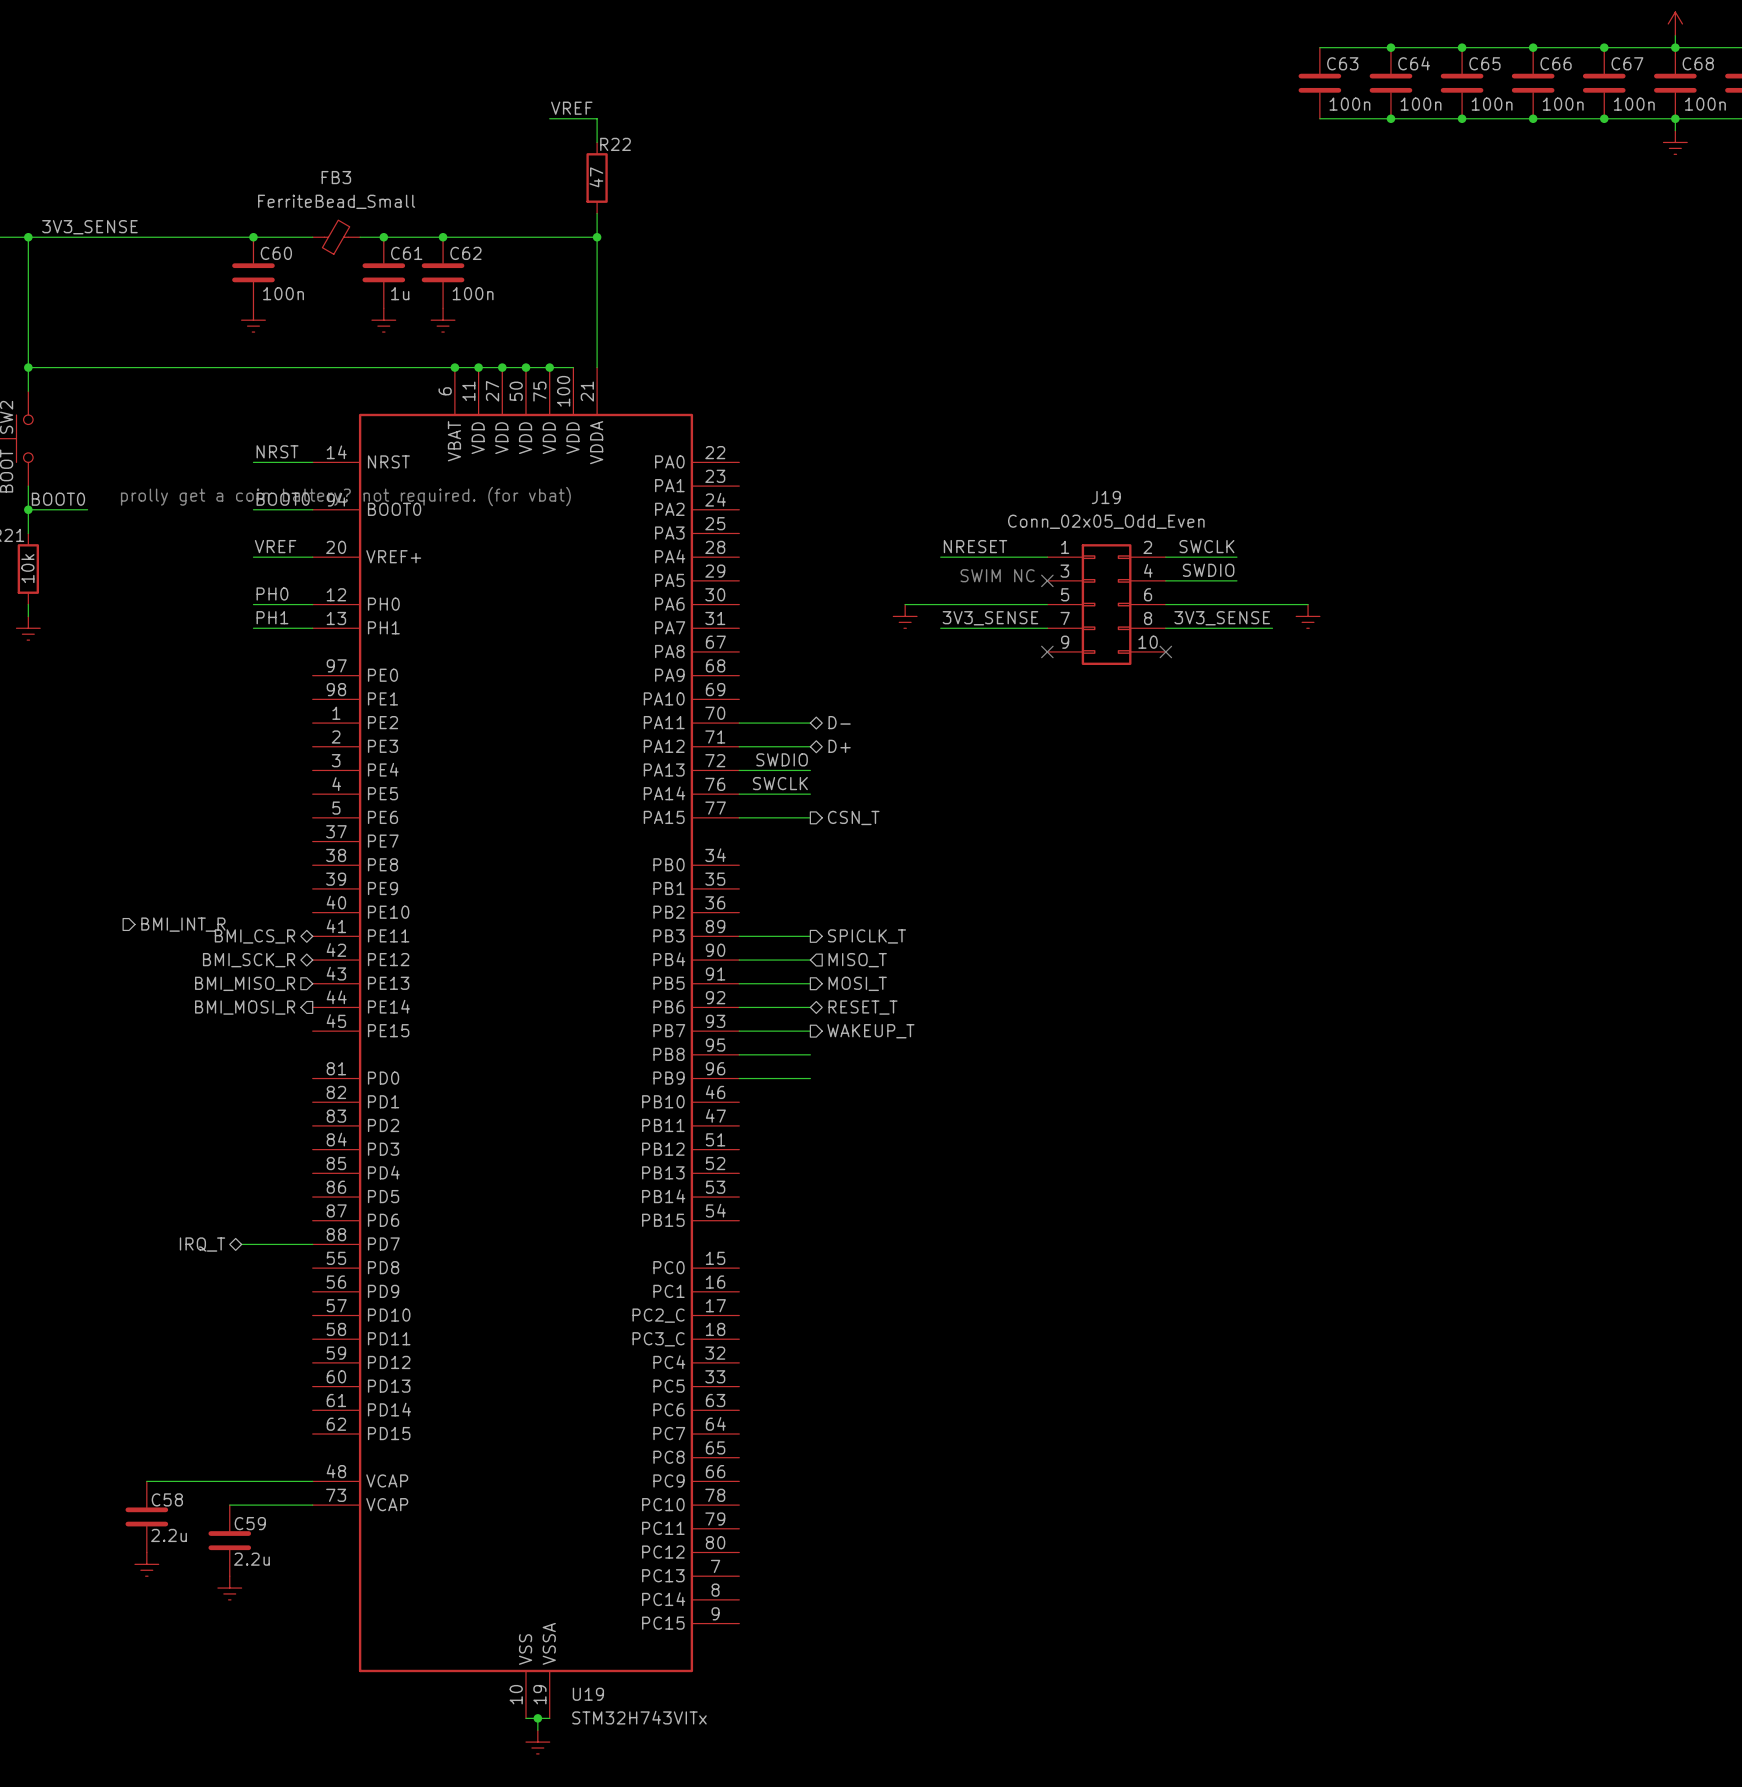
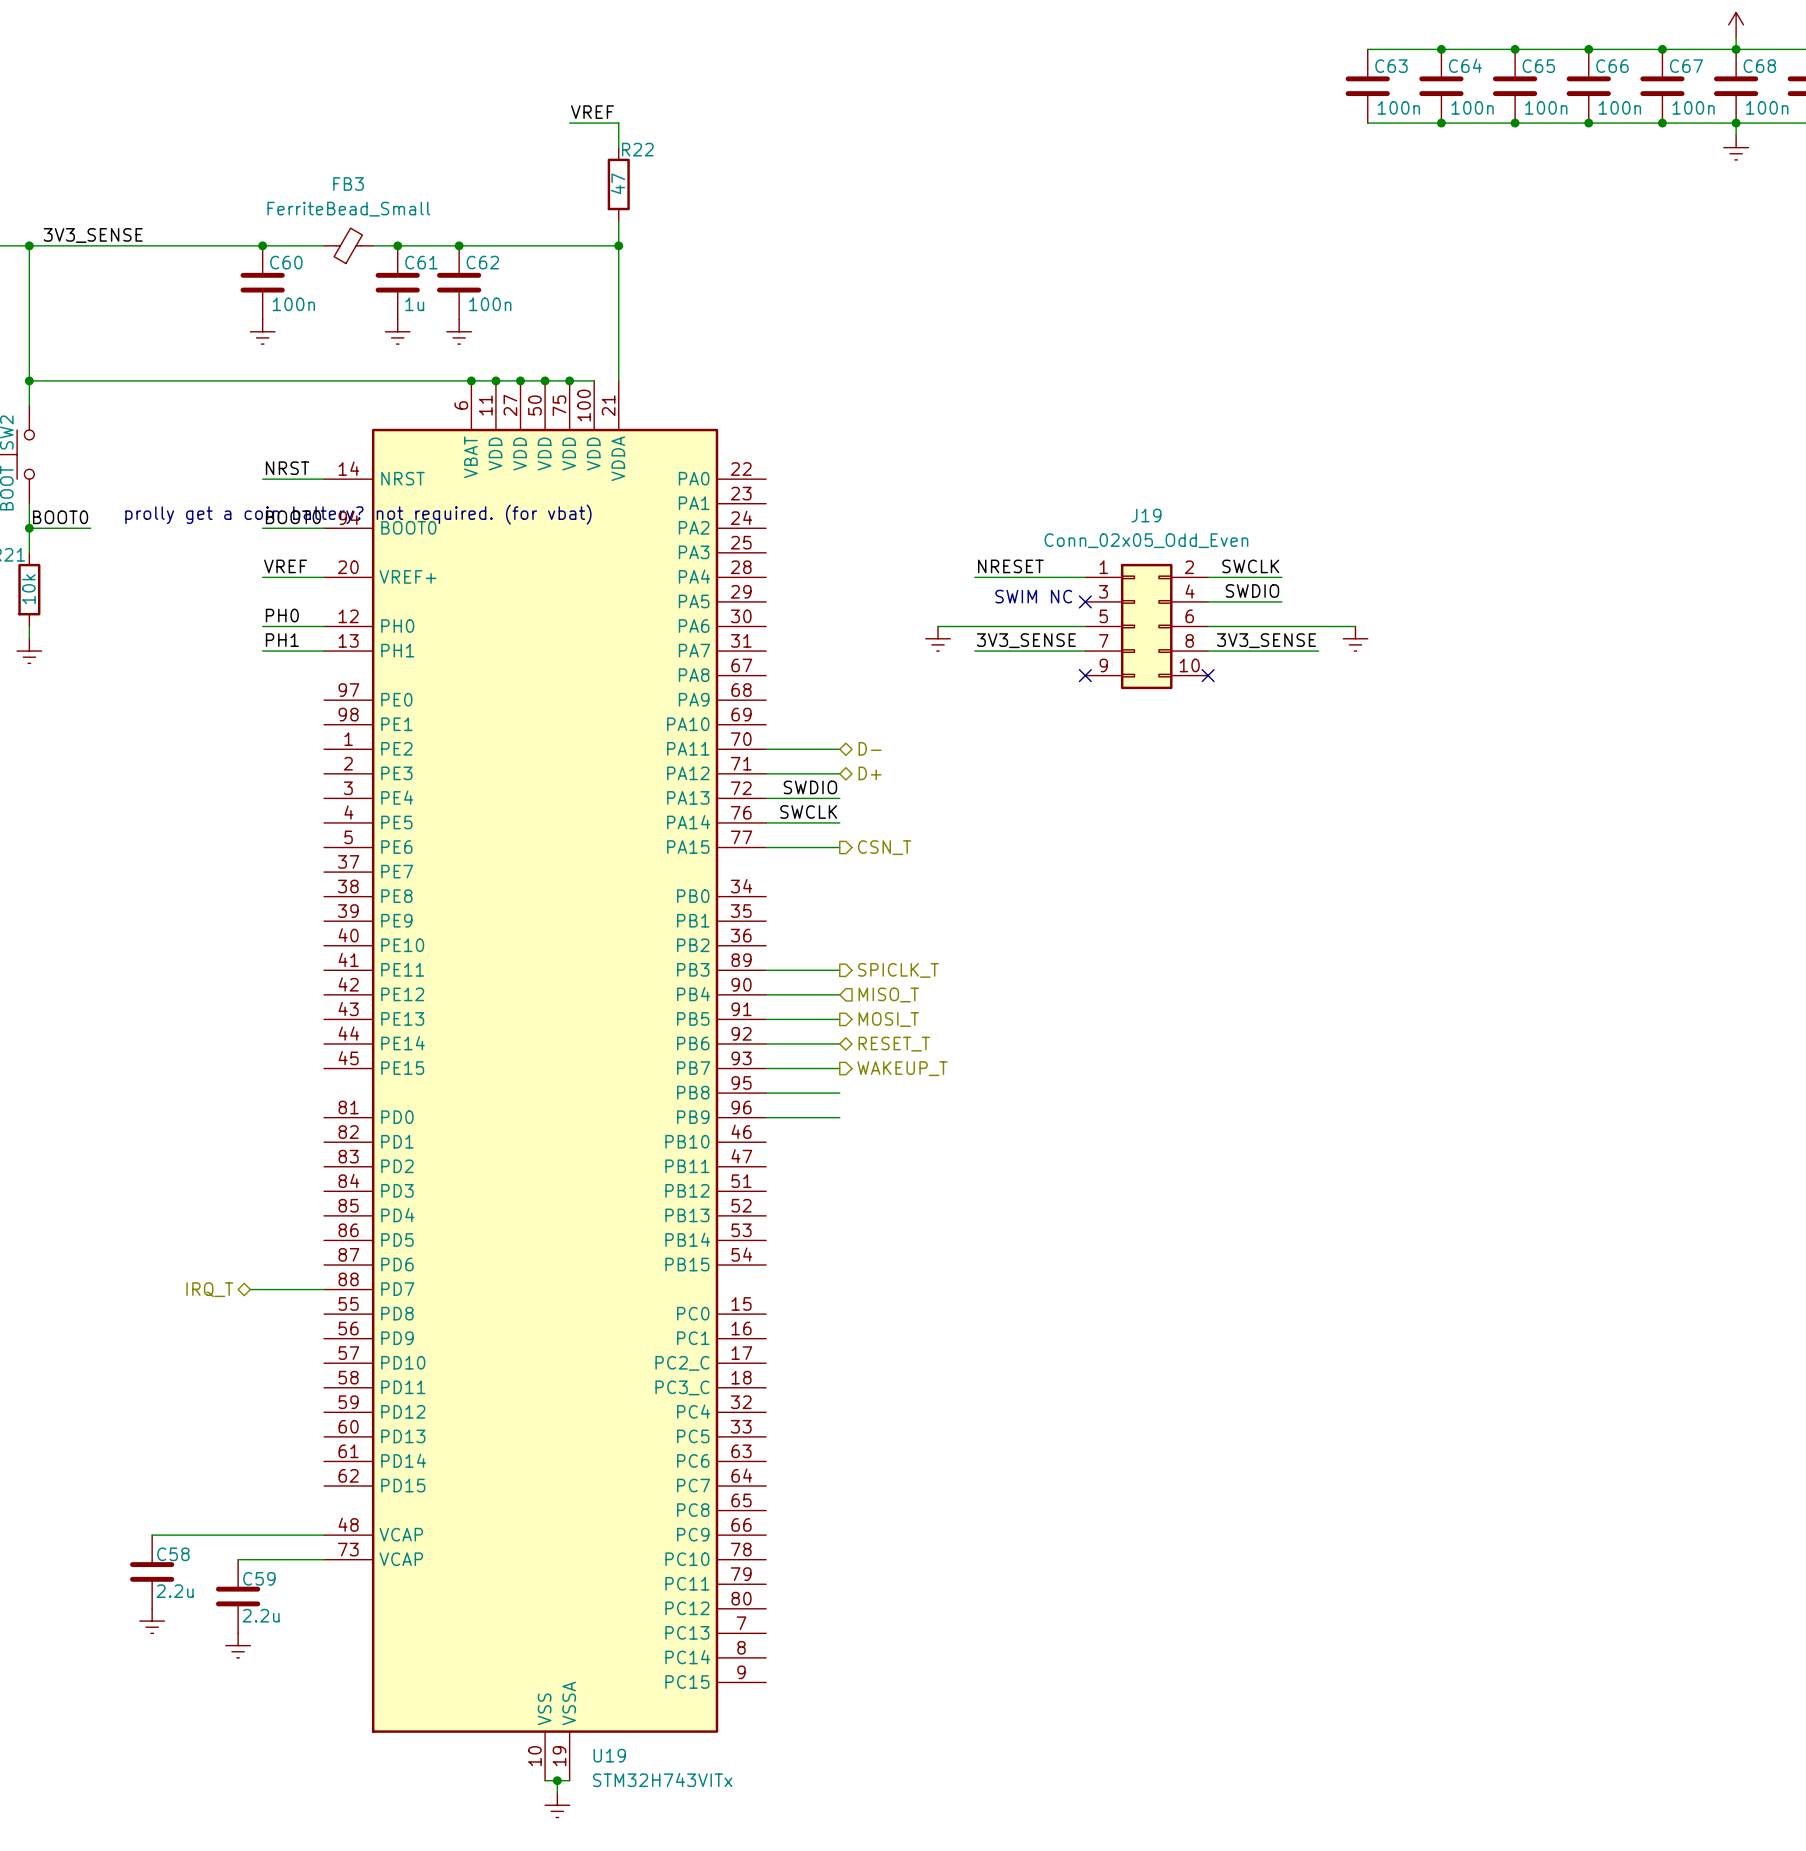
hierarchical label: BMI_INT_R (183, 924) -> none
hierarchical label: BMI_CS_R (254, 936) -> none
hierarchical label: BMI_SCK_R (249, 960) -> none
hierarchical label: BMI_MISO_R (245, 983) -> none
hierarchical label: BMI_MOSI_R (245, 1007) -> none

